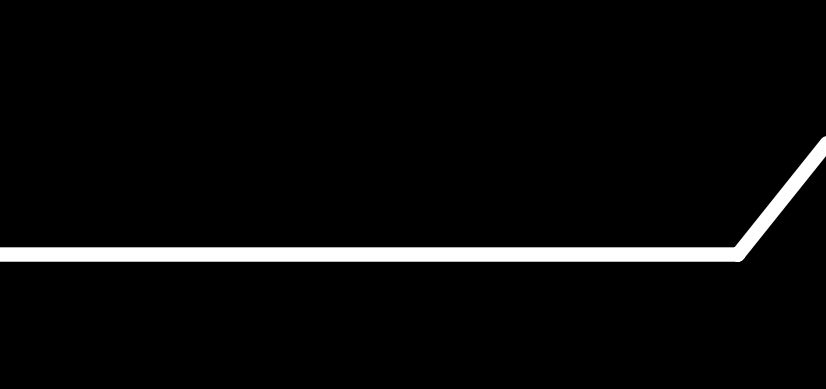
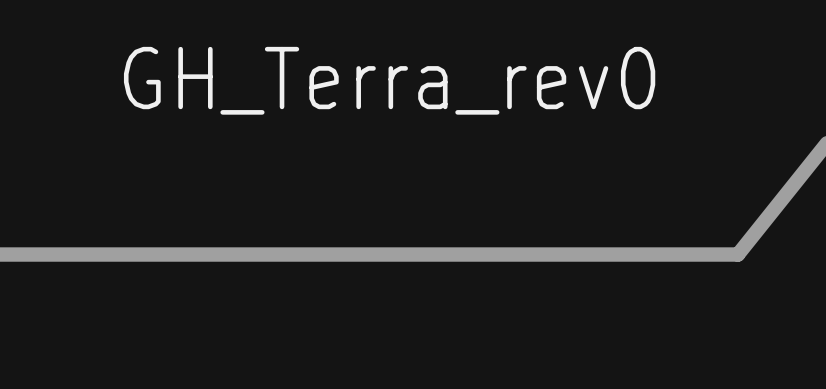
text: none -> GH_Terra_rev0 (389, 80)

